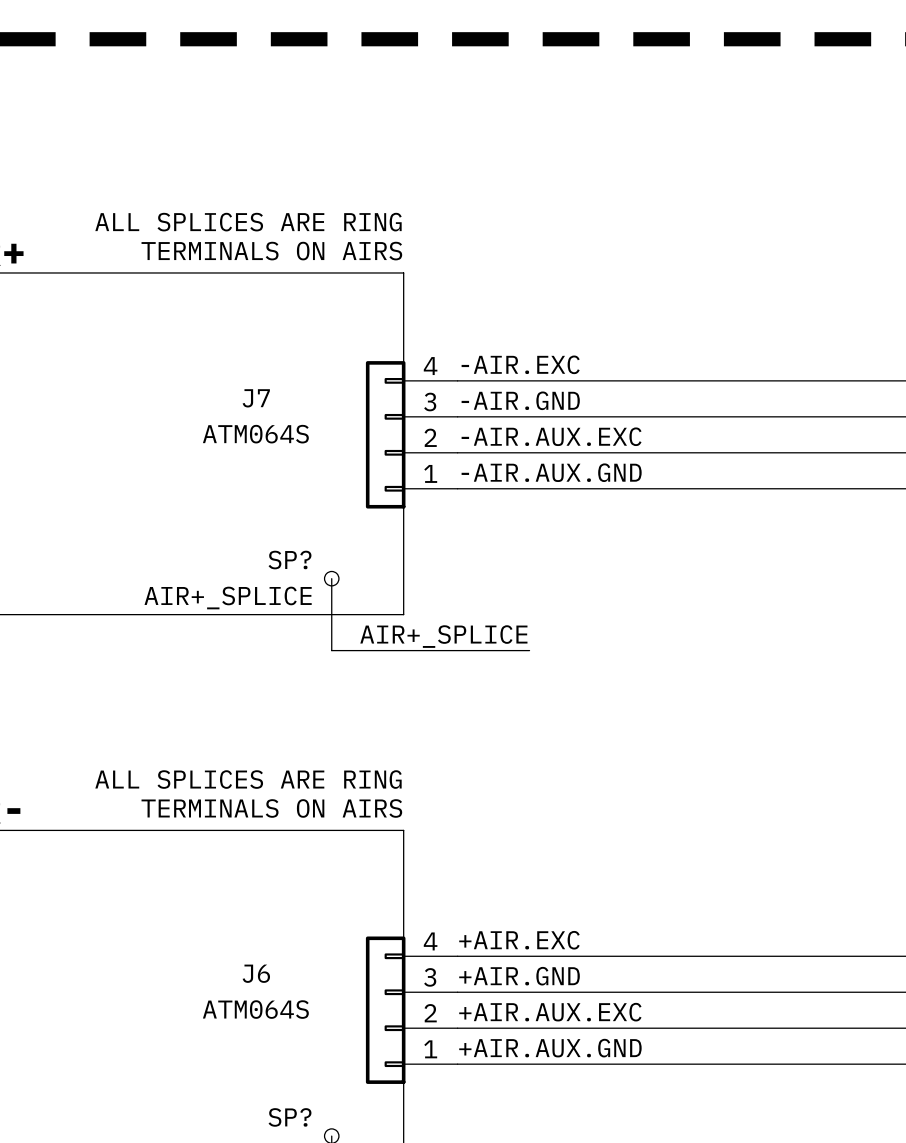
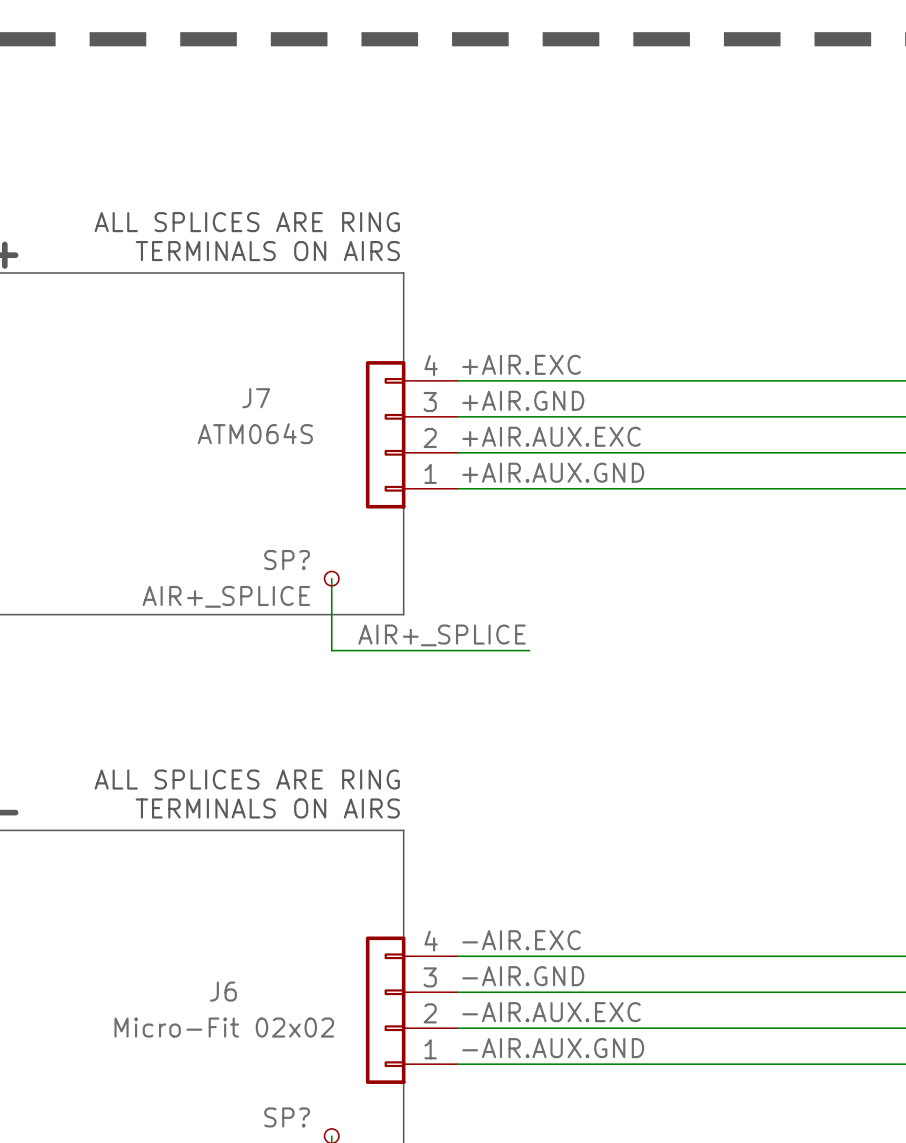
label: -AIR.EXC (520, 364) -> +AIR.EXC (521, 364)
label: -AIR.GND (520, 400) -> +AIR.GND (523, 400)
label: -AIR.AUX.EXC (551, 436) -> +AIR.AUX.EXC (551, 436)
label: -AIR.AUX.GND (551, 472) -> +AIR.AUX.GND (553, 472)
label: +AIR.EXC (519, 940) -> -AIR.EXC (521, 940)
J6 name position: J6 (256, 973) -> J6 (223, 991)
label: +AIR.GND (519, 976) -> -AIR.GND (523, 976)
J6 value: ATM064S (255, 1009) -> Micro-Fit 02x02 (224, 1027)
label: +AIR.AUX.EXC (550, 1012) -> -AIR.AUX.EXC (551, 1012)
label: +AIR.AUX.GND (550, 1048) -> -AIR.AUX.GND (553, 1048)

